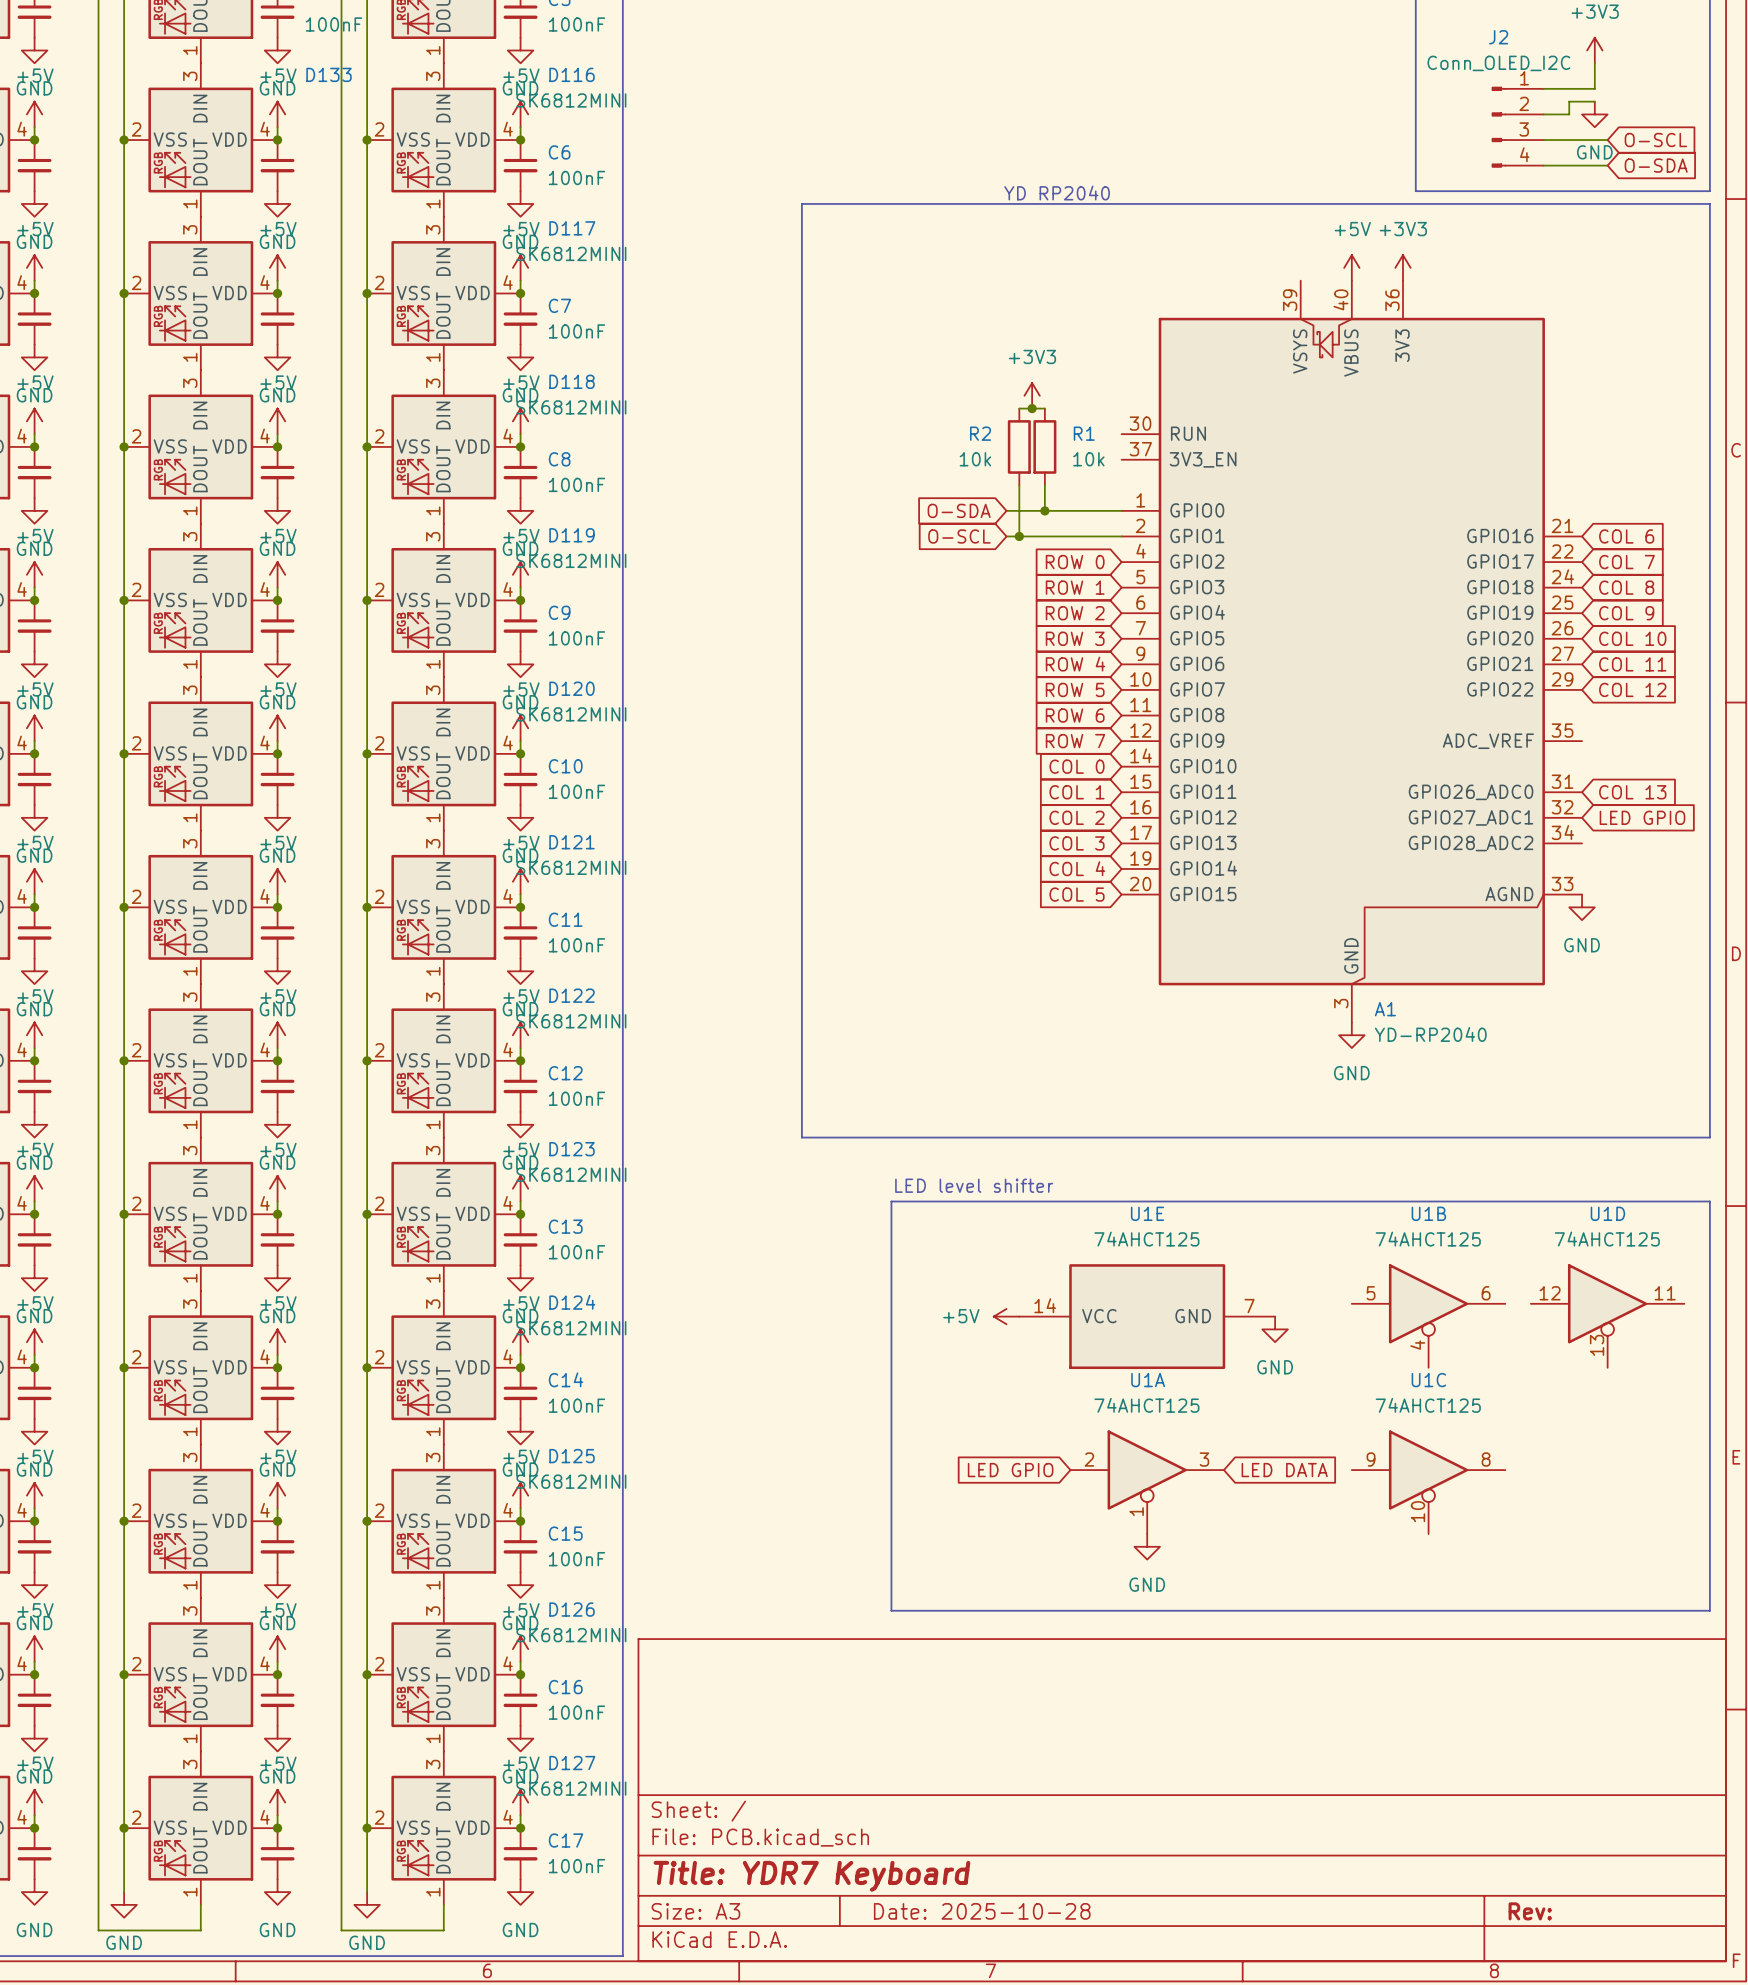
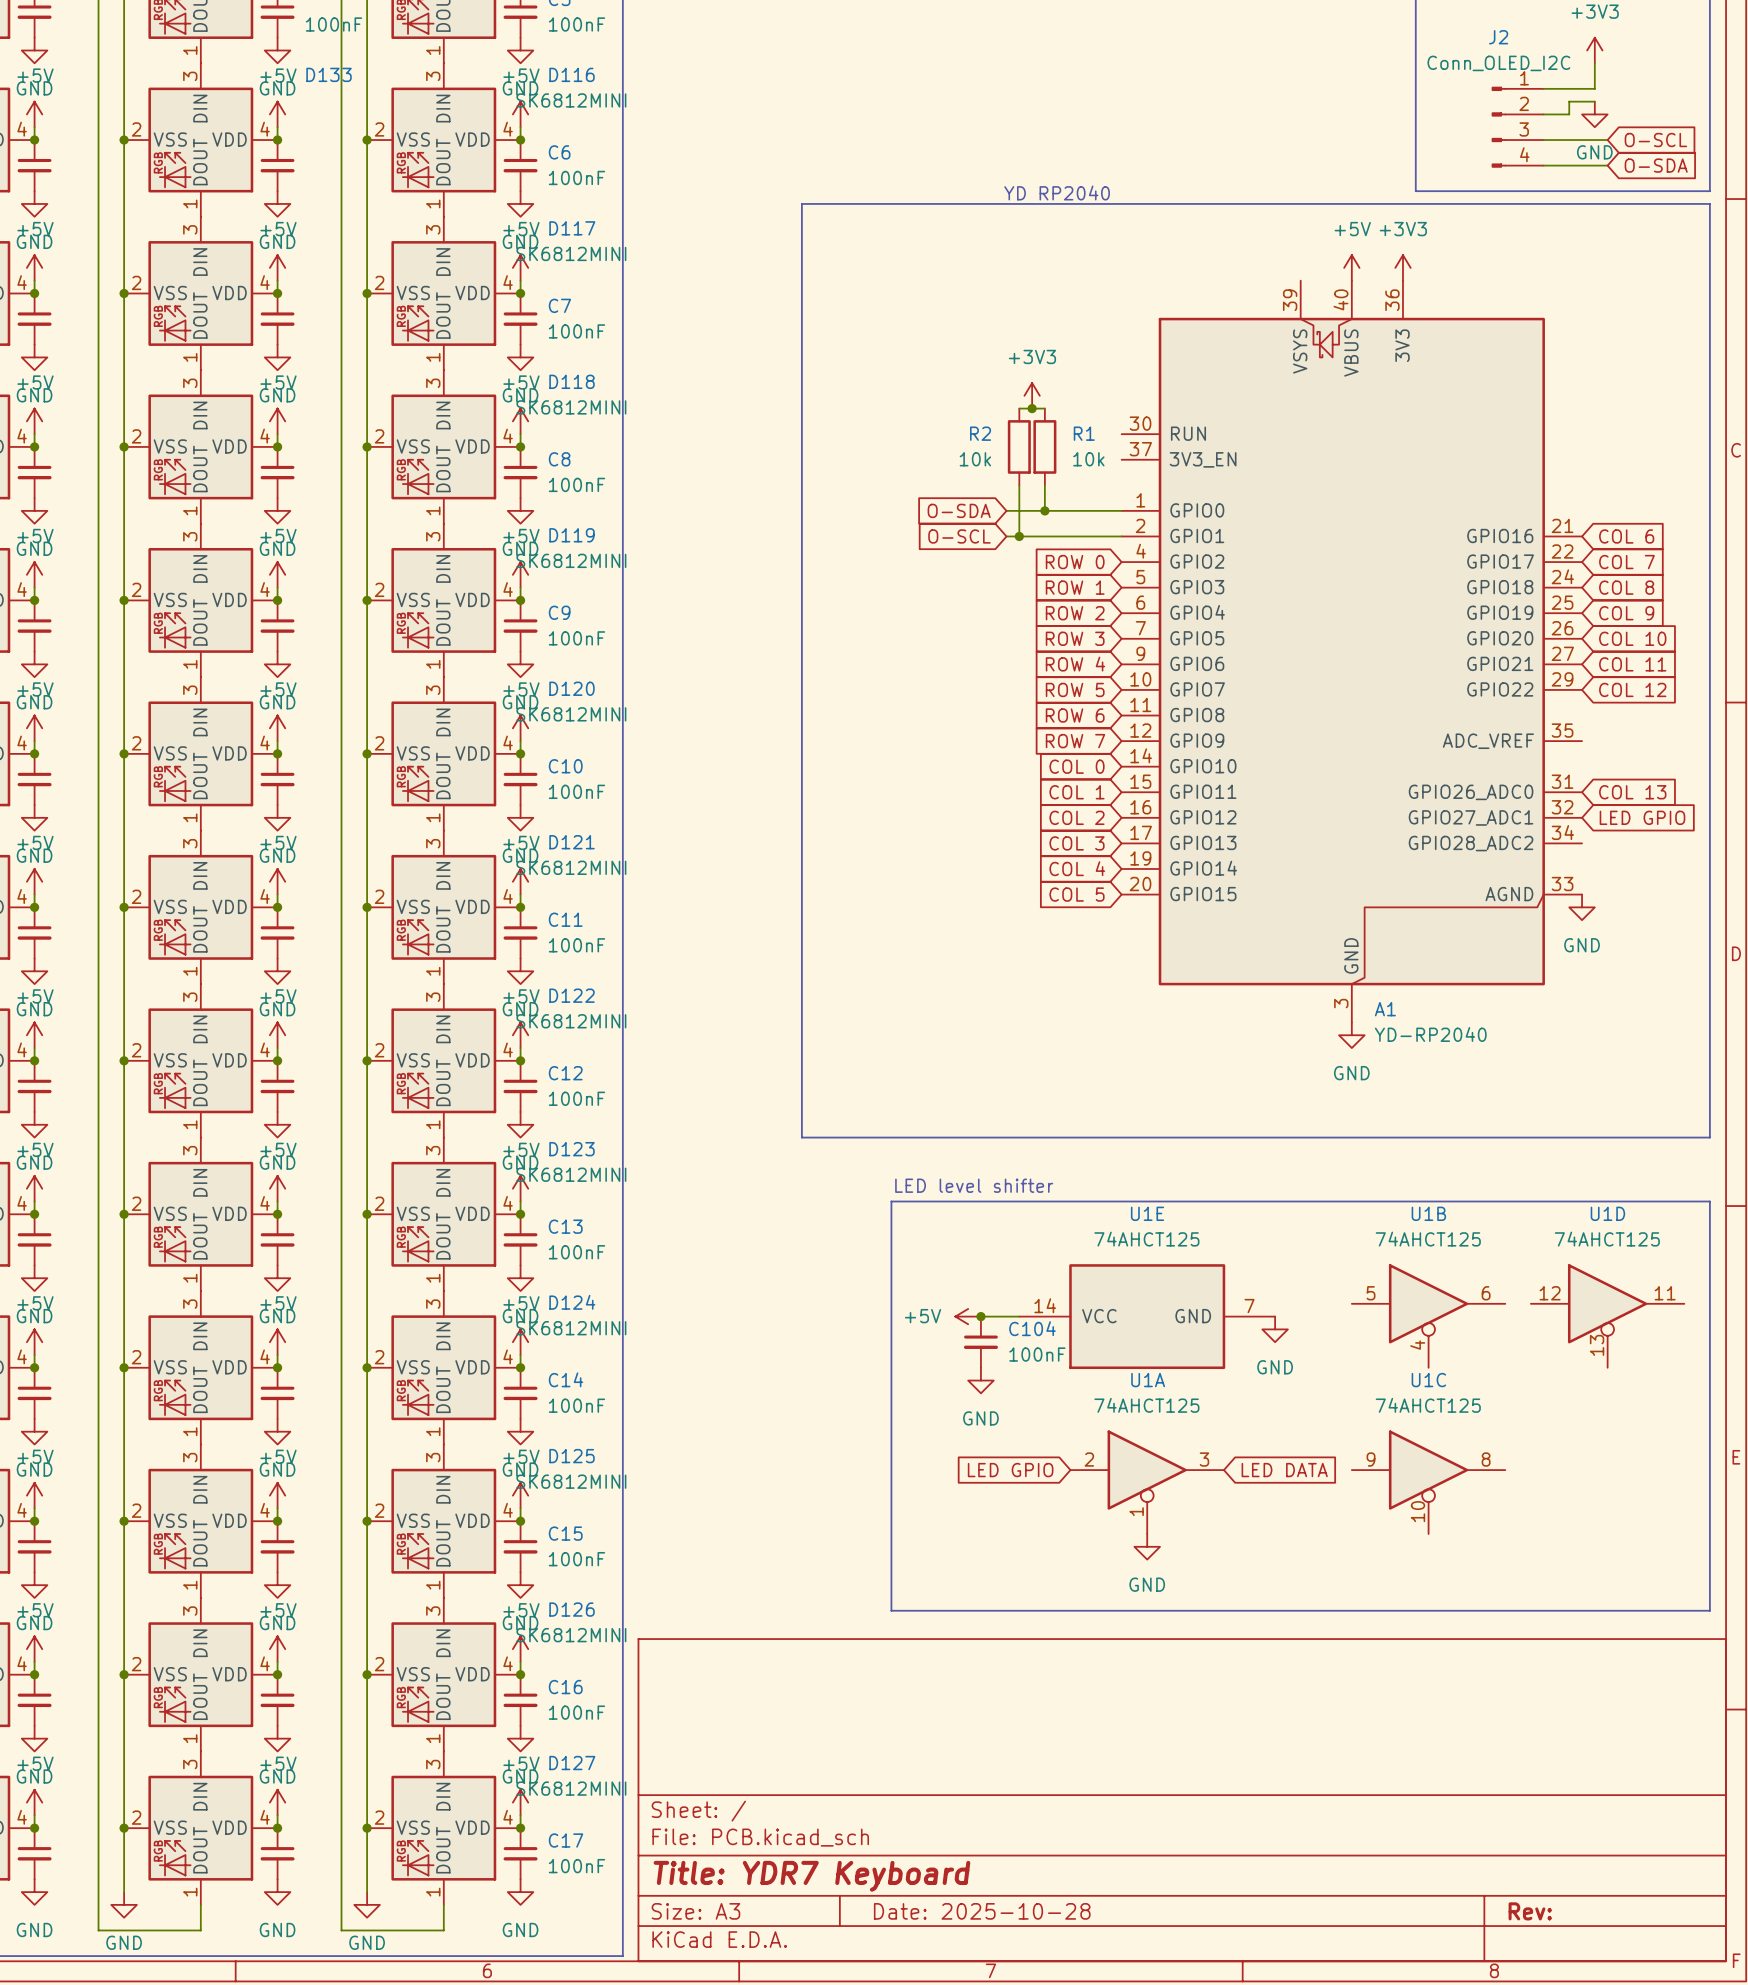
junction: none -> (980, 1316)
power symbol position: +5V (1006, 1316) -> +5V (968, 1316)
C104: none -> 100nF (980, 1342)
power symbol: none -> GND (980, 1380)

